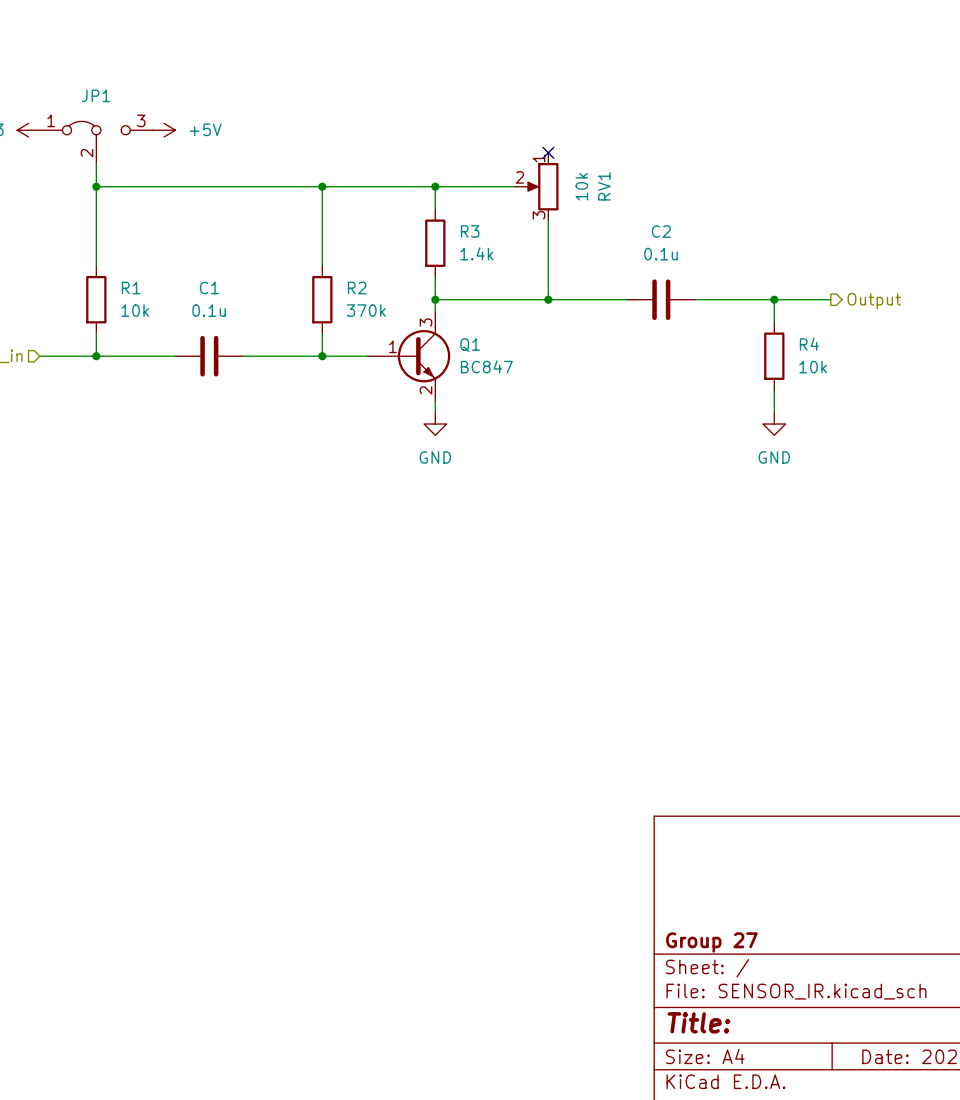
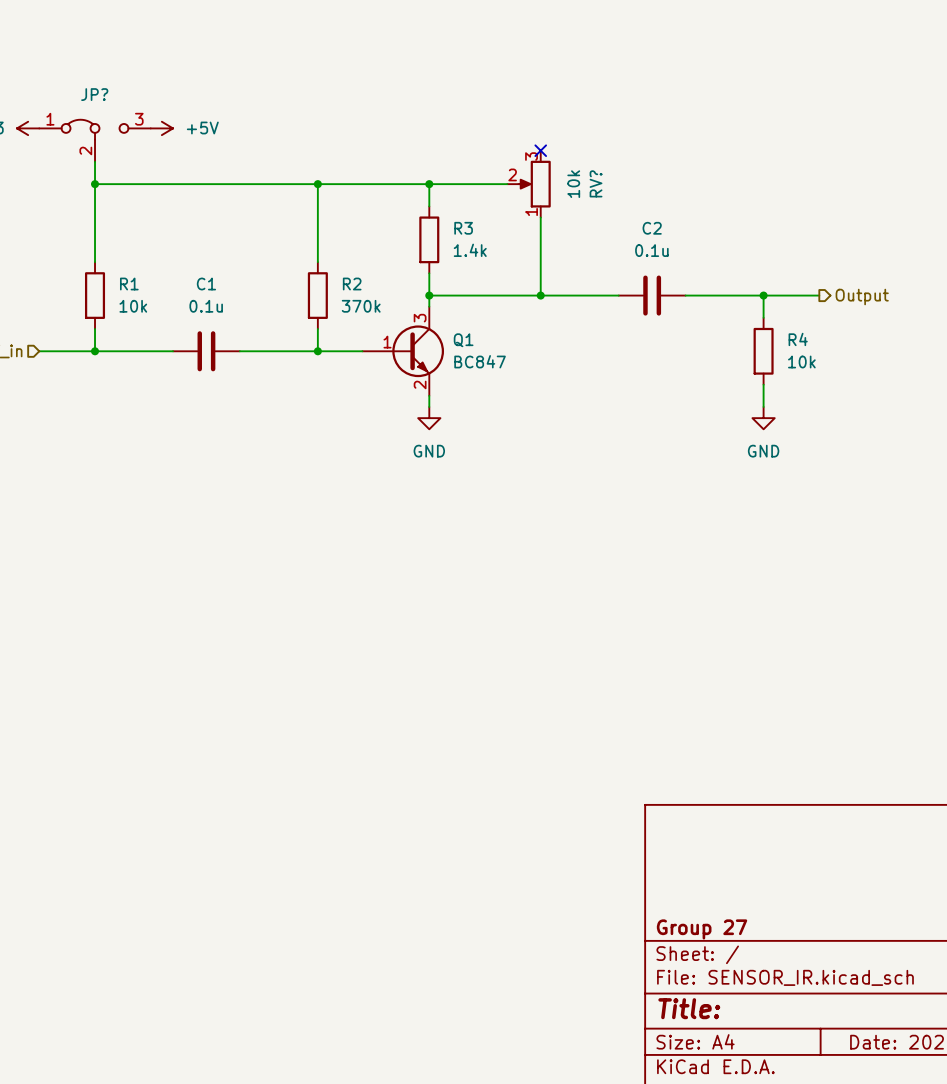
JP1 name: JP1 (96, 95) -> JP? (94, 94)
RV1 flip: as is (542, 186) -> up-down (534, 184)
RV1 name: RV1 (604, 186) -> RV? (596, 183)

